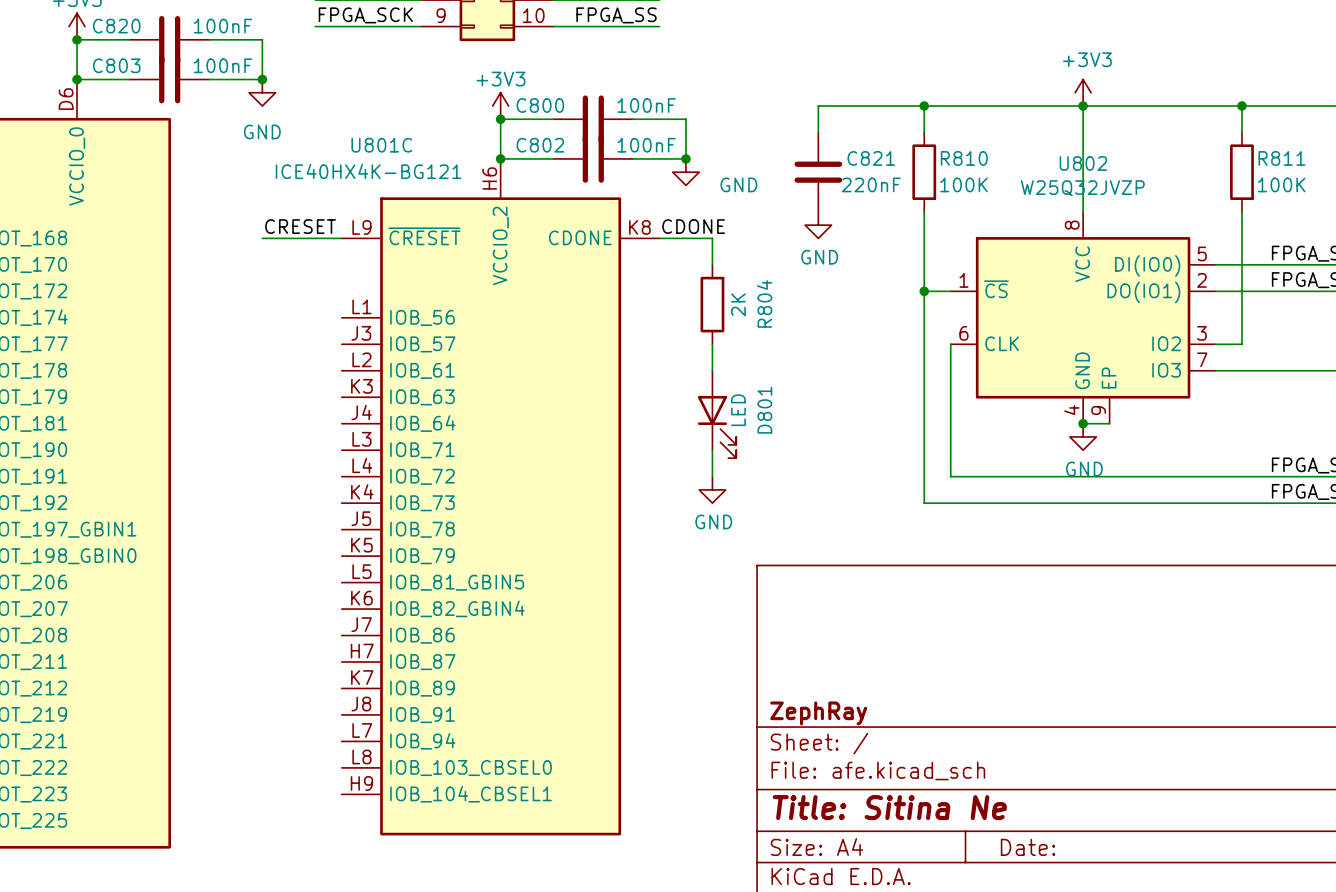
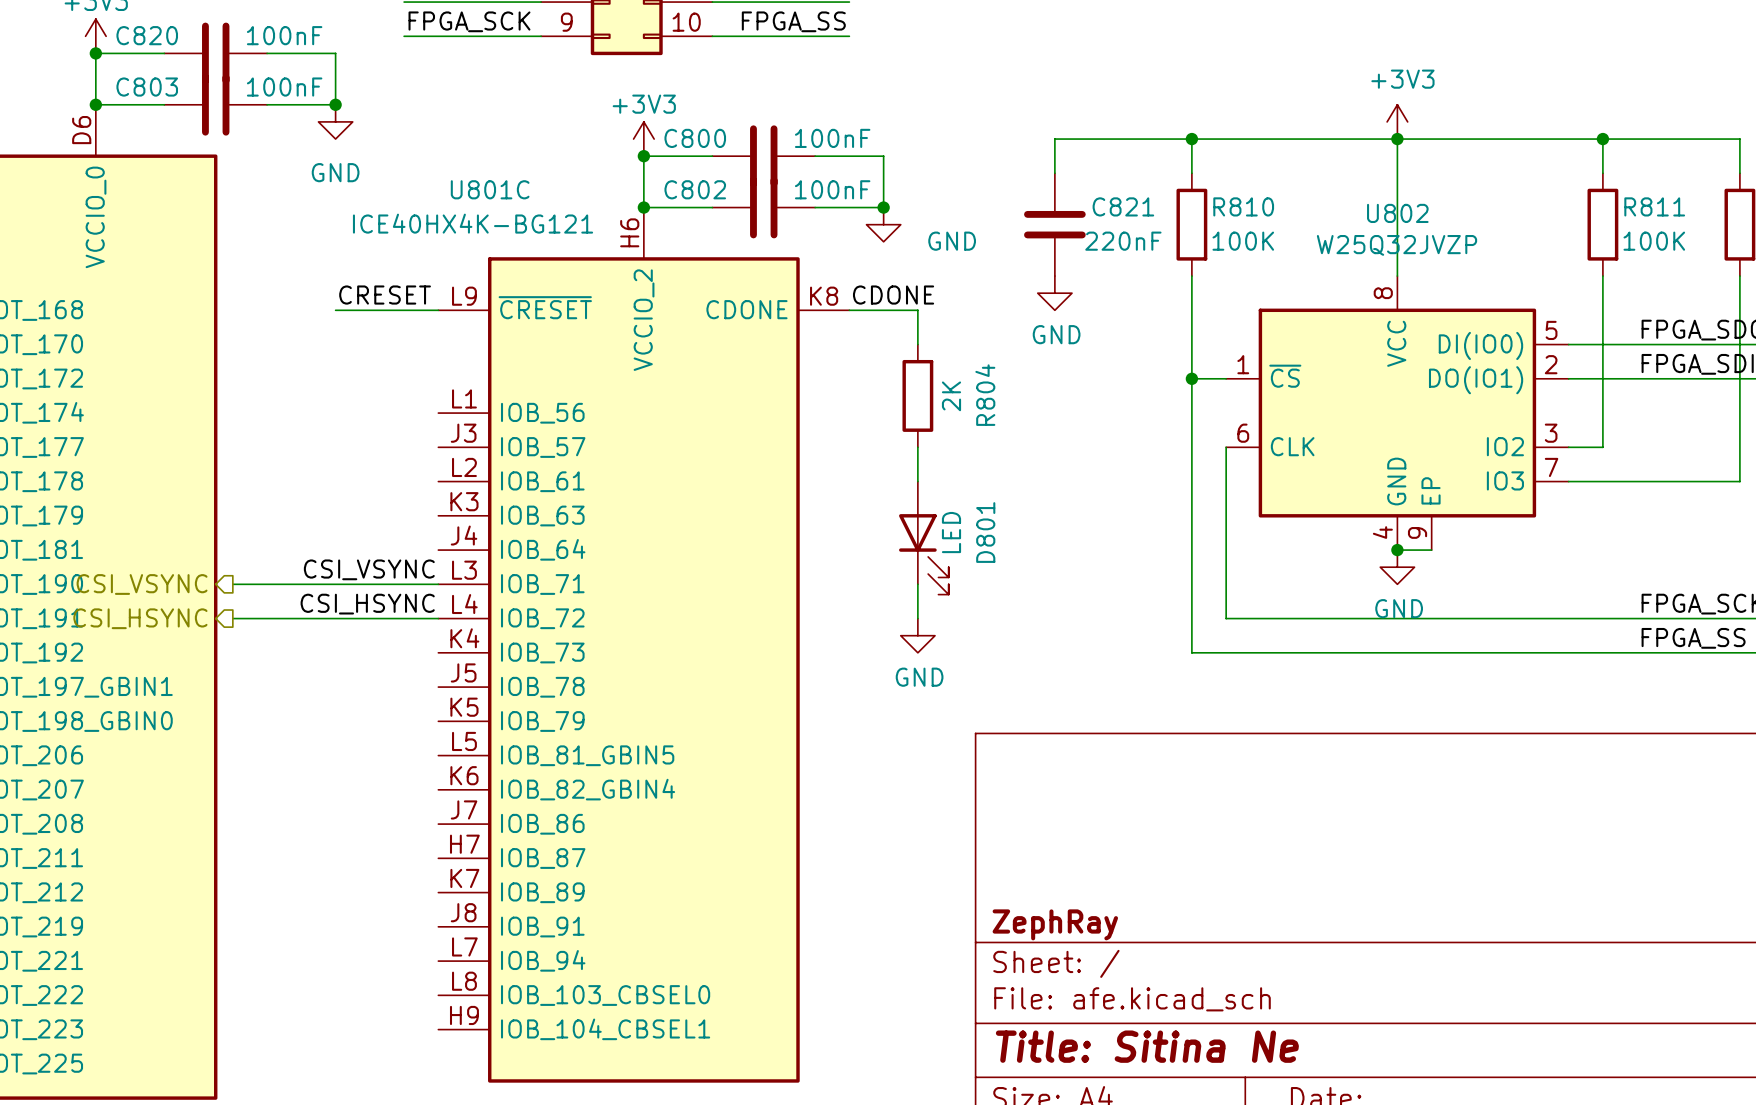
label: none -> CSI_VSYNC (369, 569)
hierarchical label: none -> CSI_VSYNC (142, 584)
wire: none -> (232, 584) (438, 584)
label: none -> CSI_HSYNC (367, 604)
hierarchical label: none -> CSI_HSYNC (140, 618)
wire: none -> (232, 618) (438, 618)

